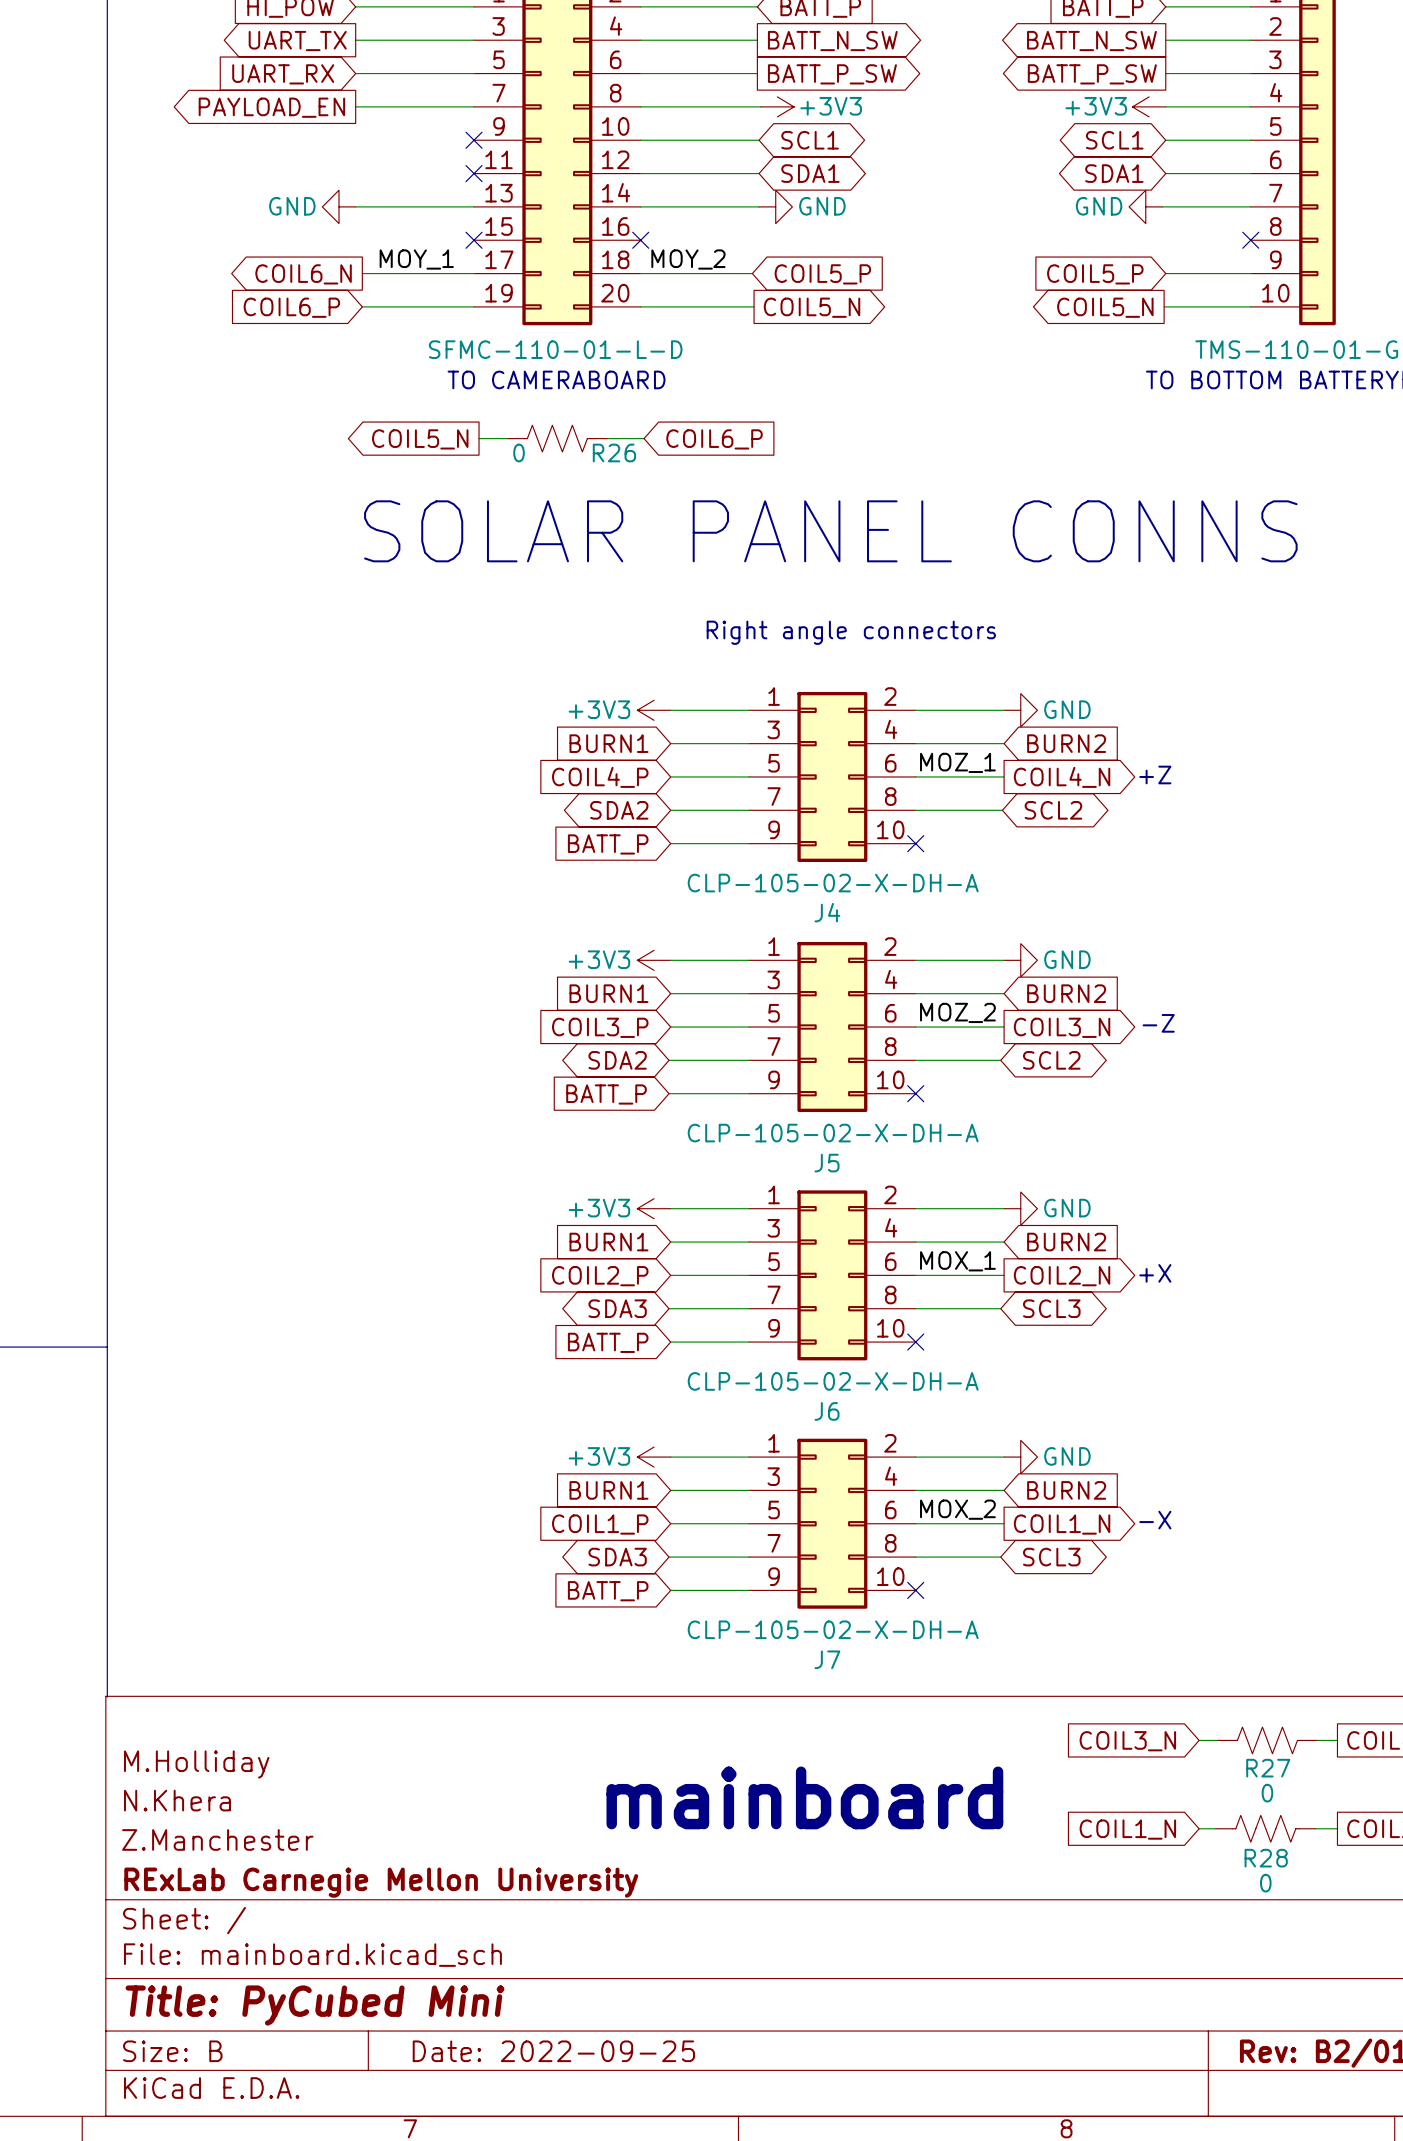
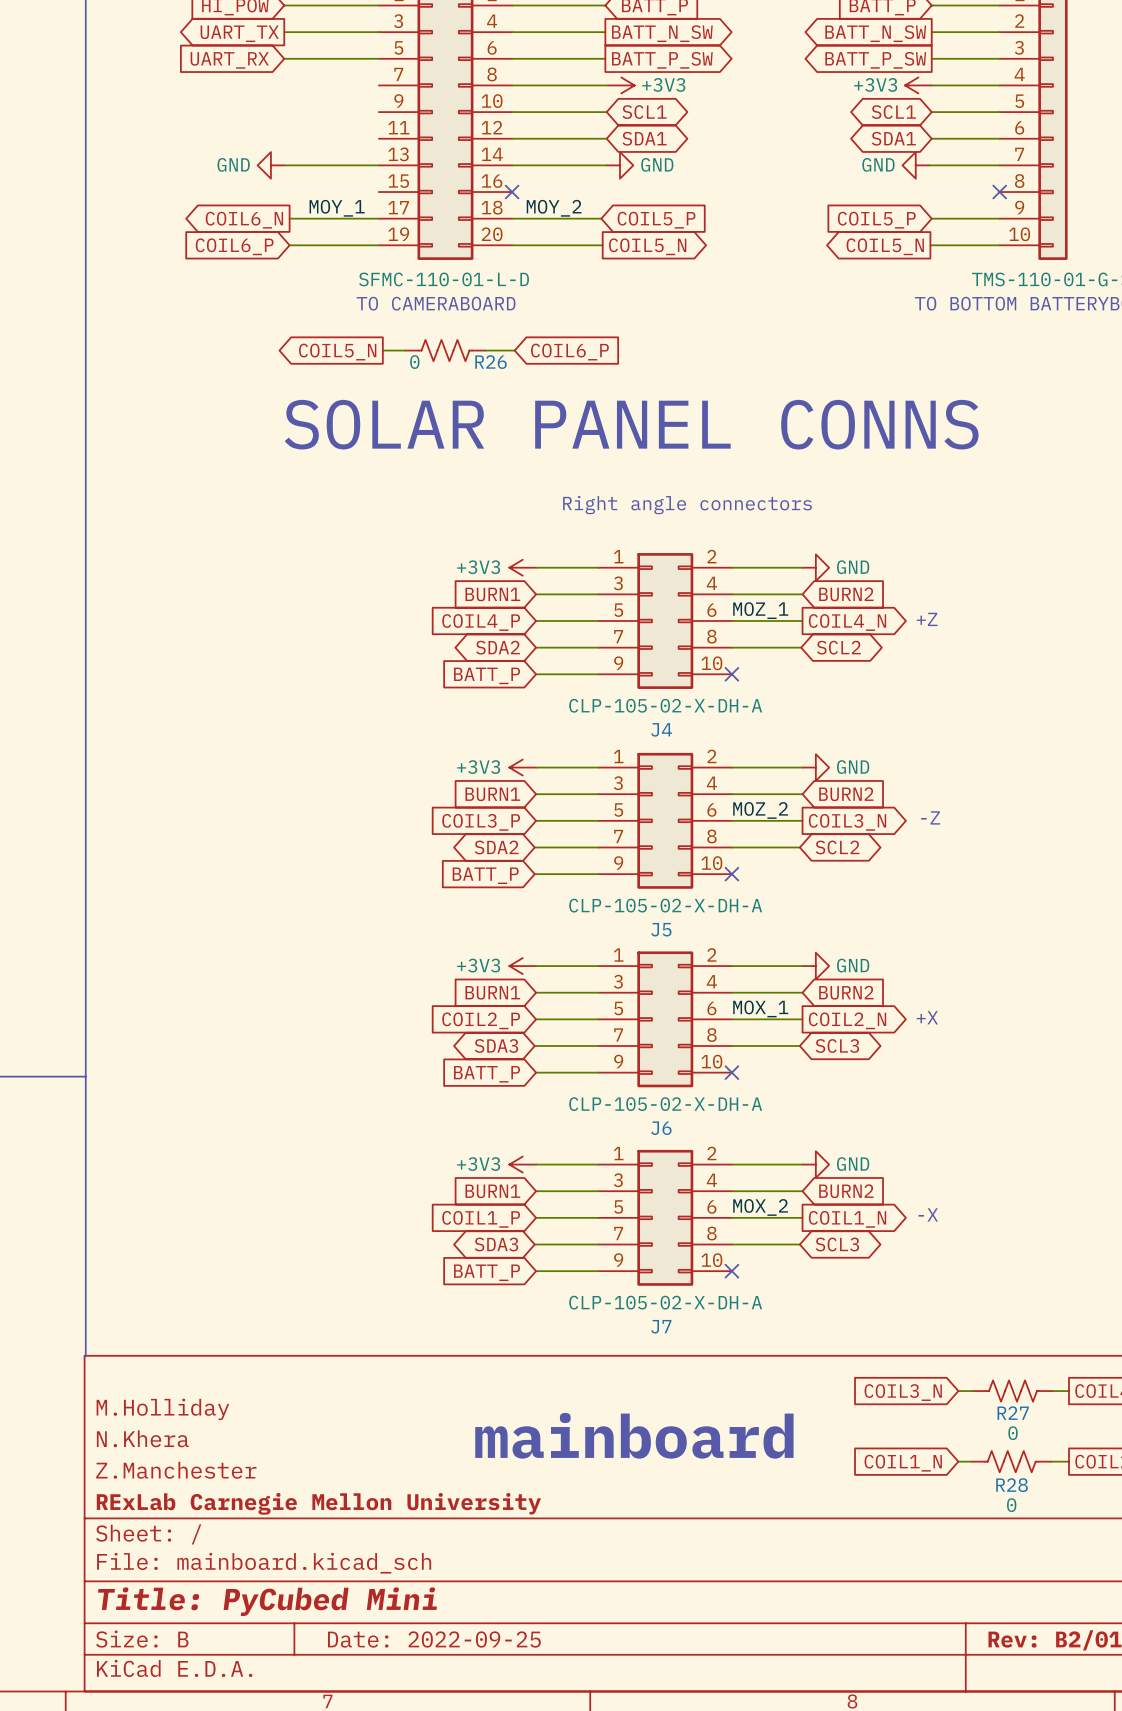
wire: (355, 106) (474, 106) -> none
global label: PAYLOAD_EN (271, 107) -> none
no-connect mark: (474, 140) -> none
no-connect mark: (474, 173) -> none
no-connect mark: (474, 240) -> none

